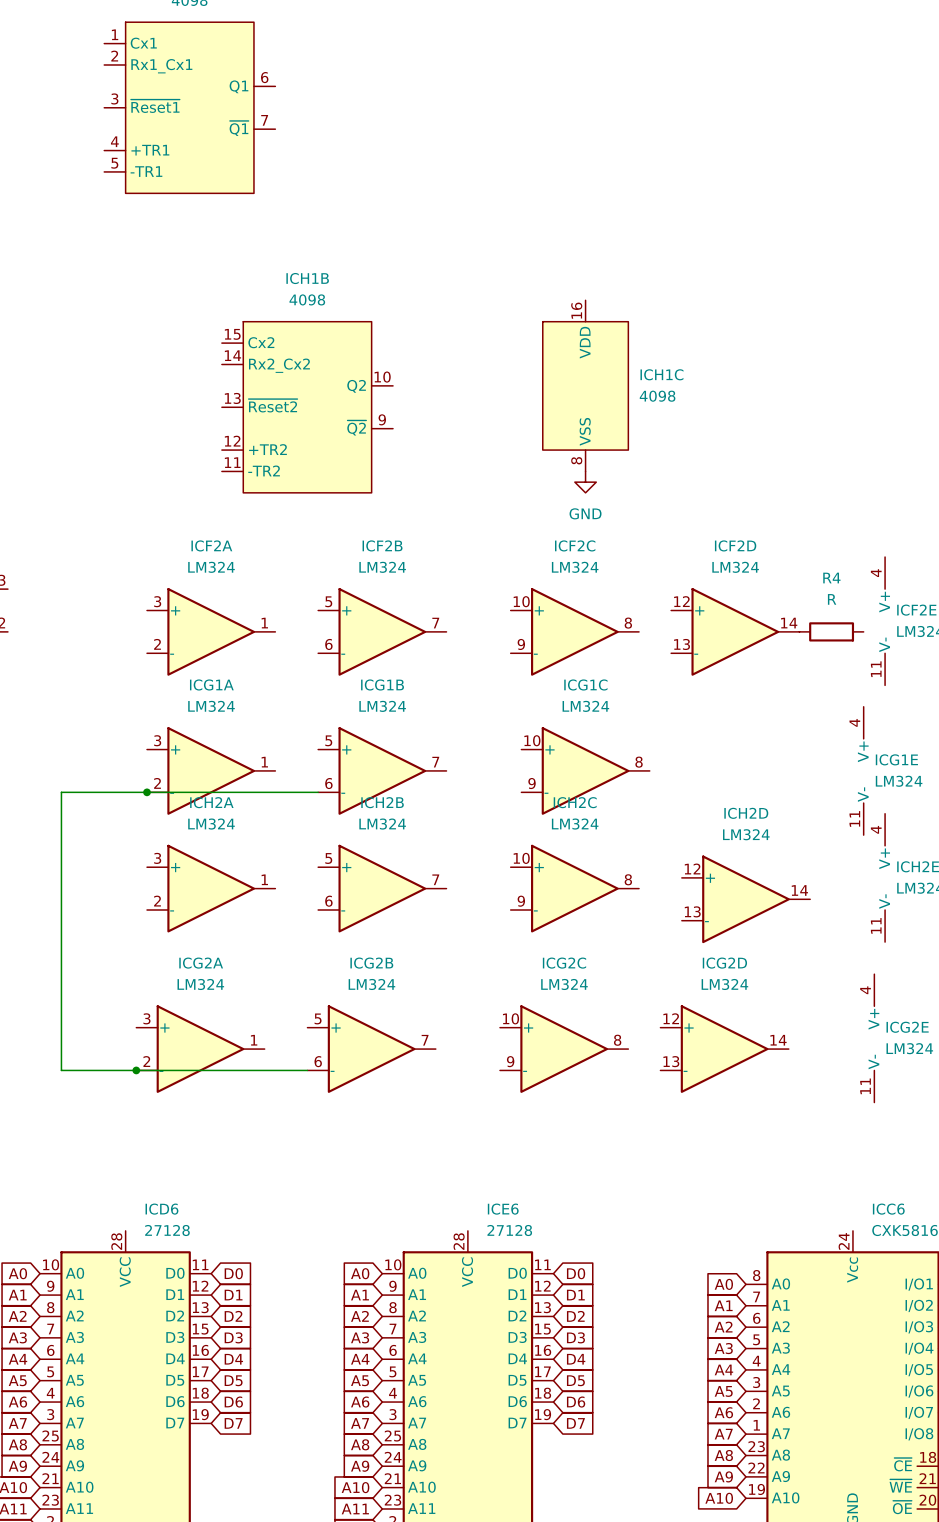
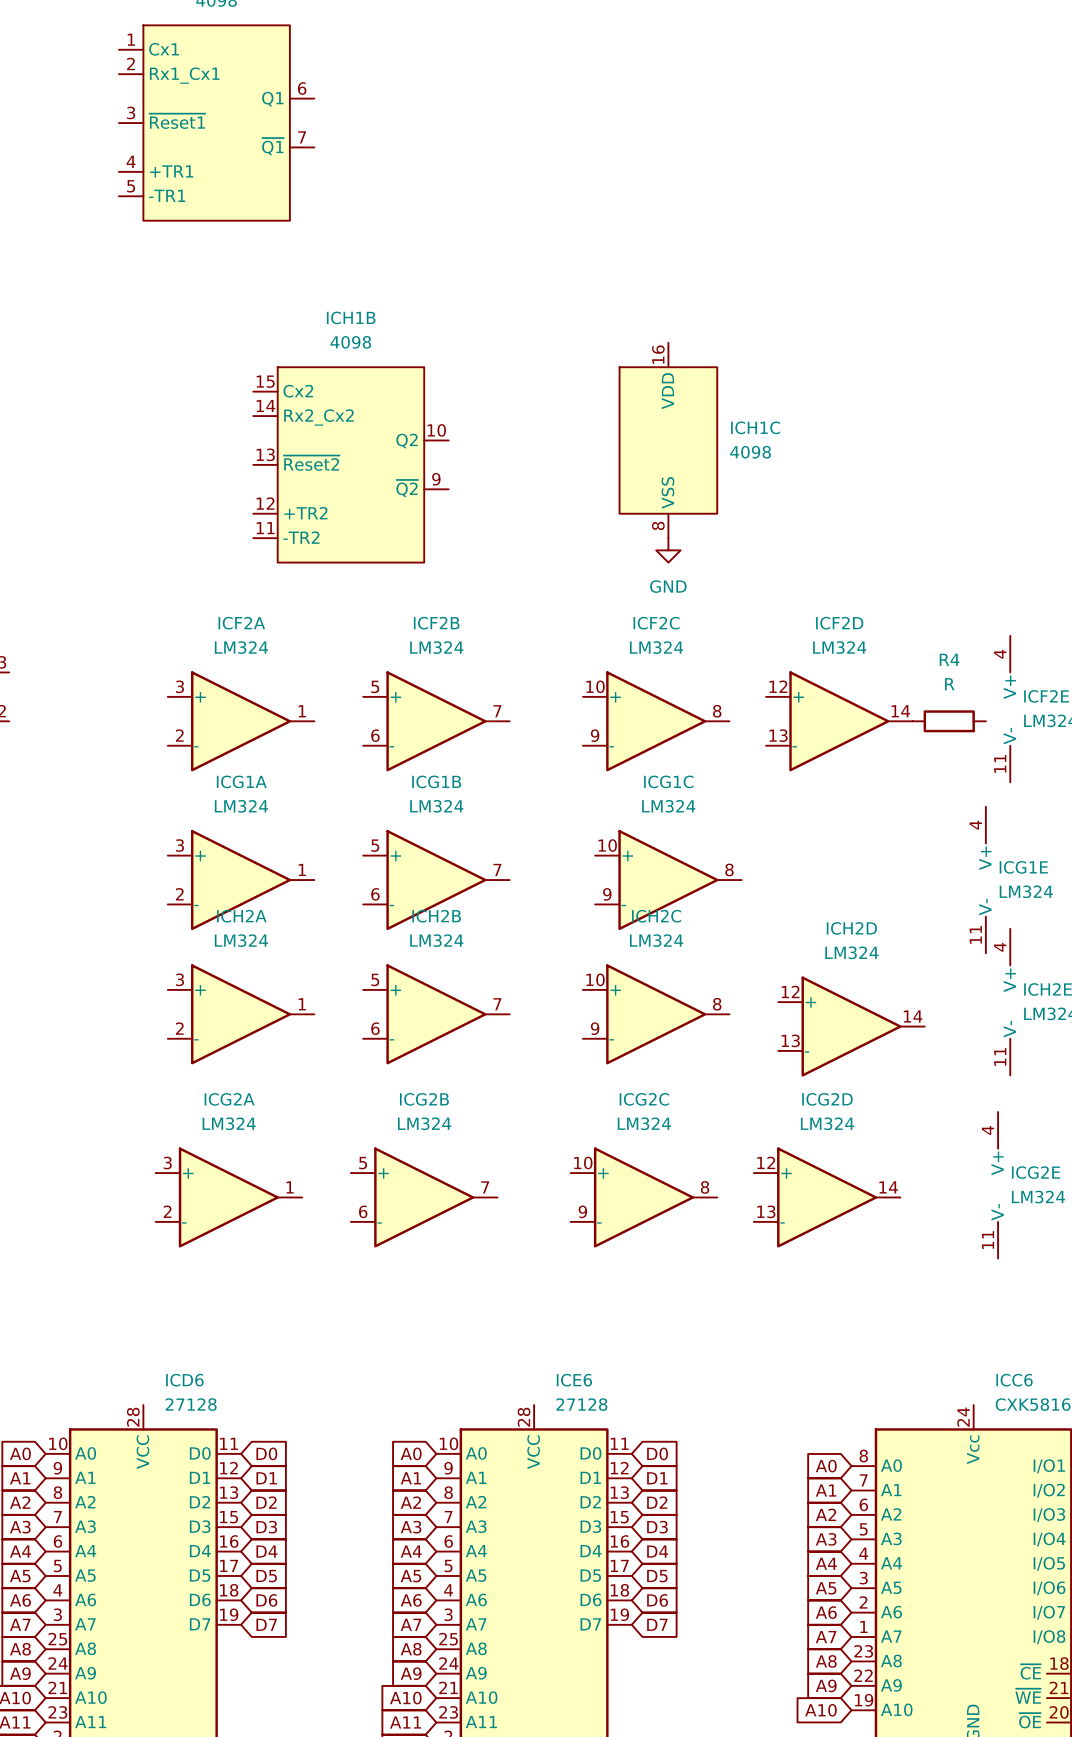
junction: (147, 792) -> none
wire: (318, 792) (61, 792) (61, 1070) (307, 1070) -> none
junction: (136, 1070) -> none

